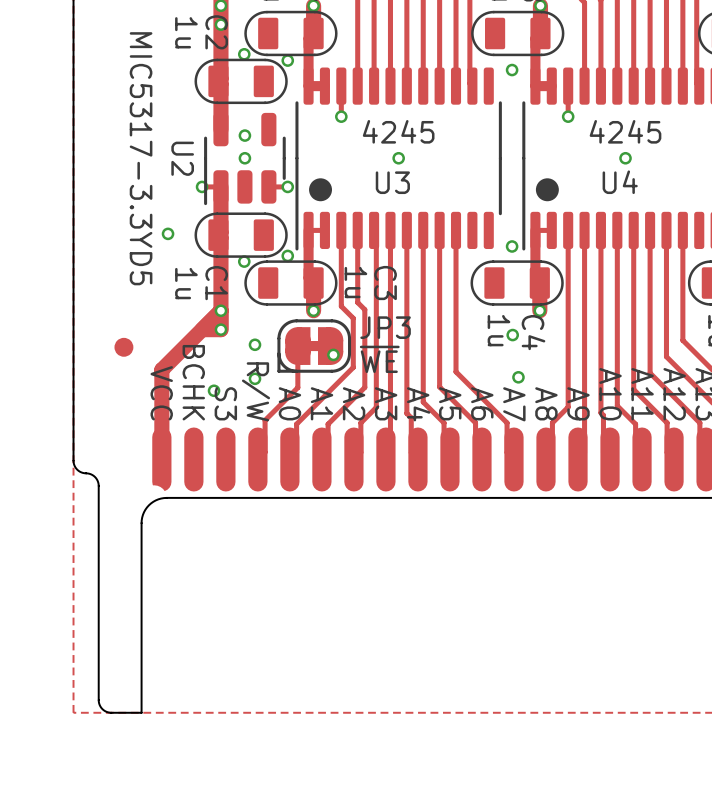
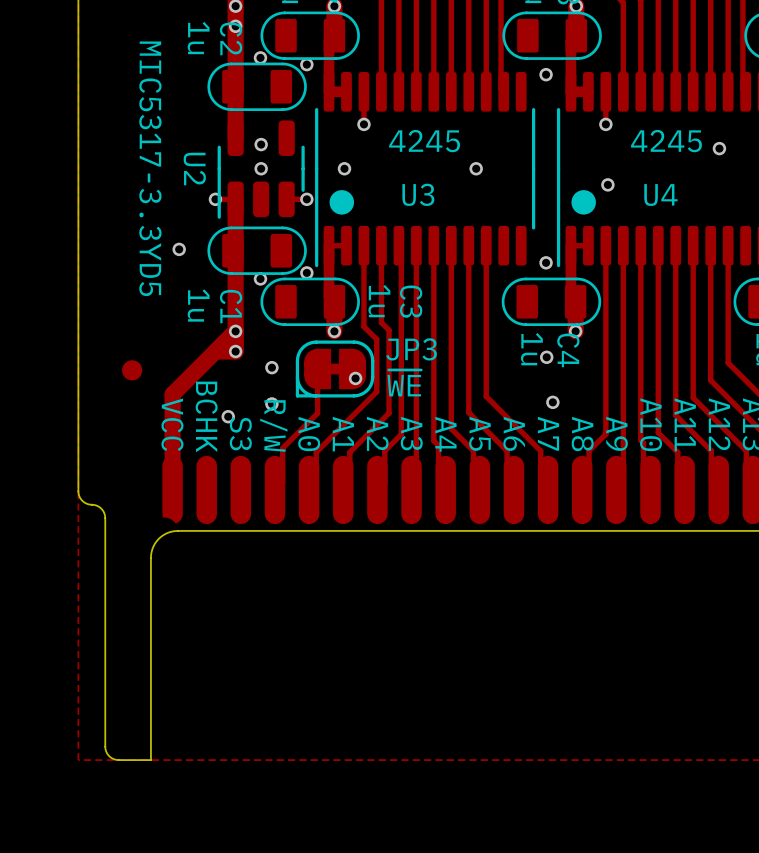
via: none -> (719, 148)
via: none -> (344, 168)
via: (398, 158) -> none
via: none -> (476, 168)
via: (625, 158) -> none
via: none -> (607, 184)

